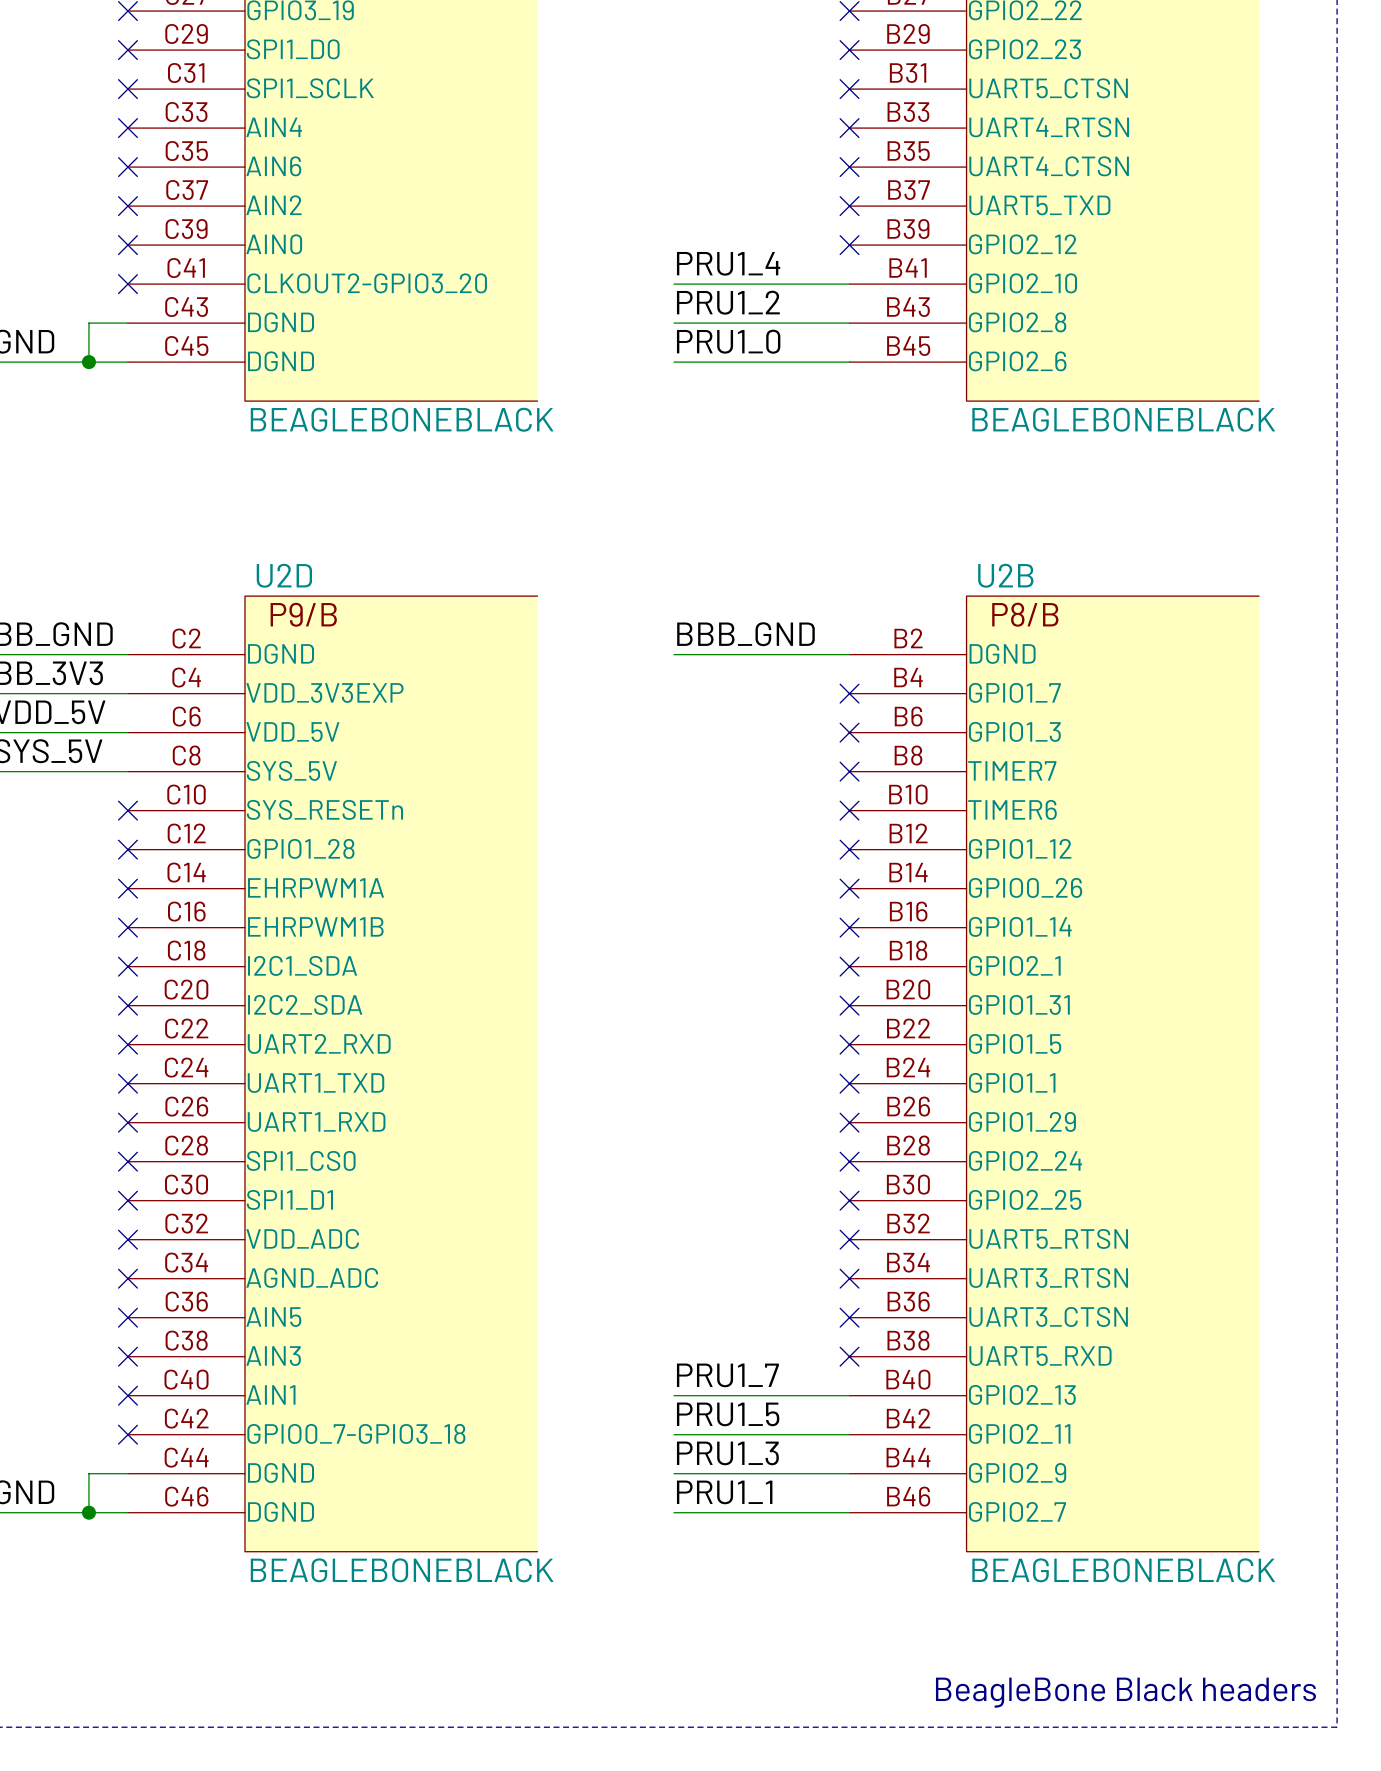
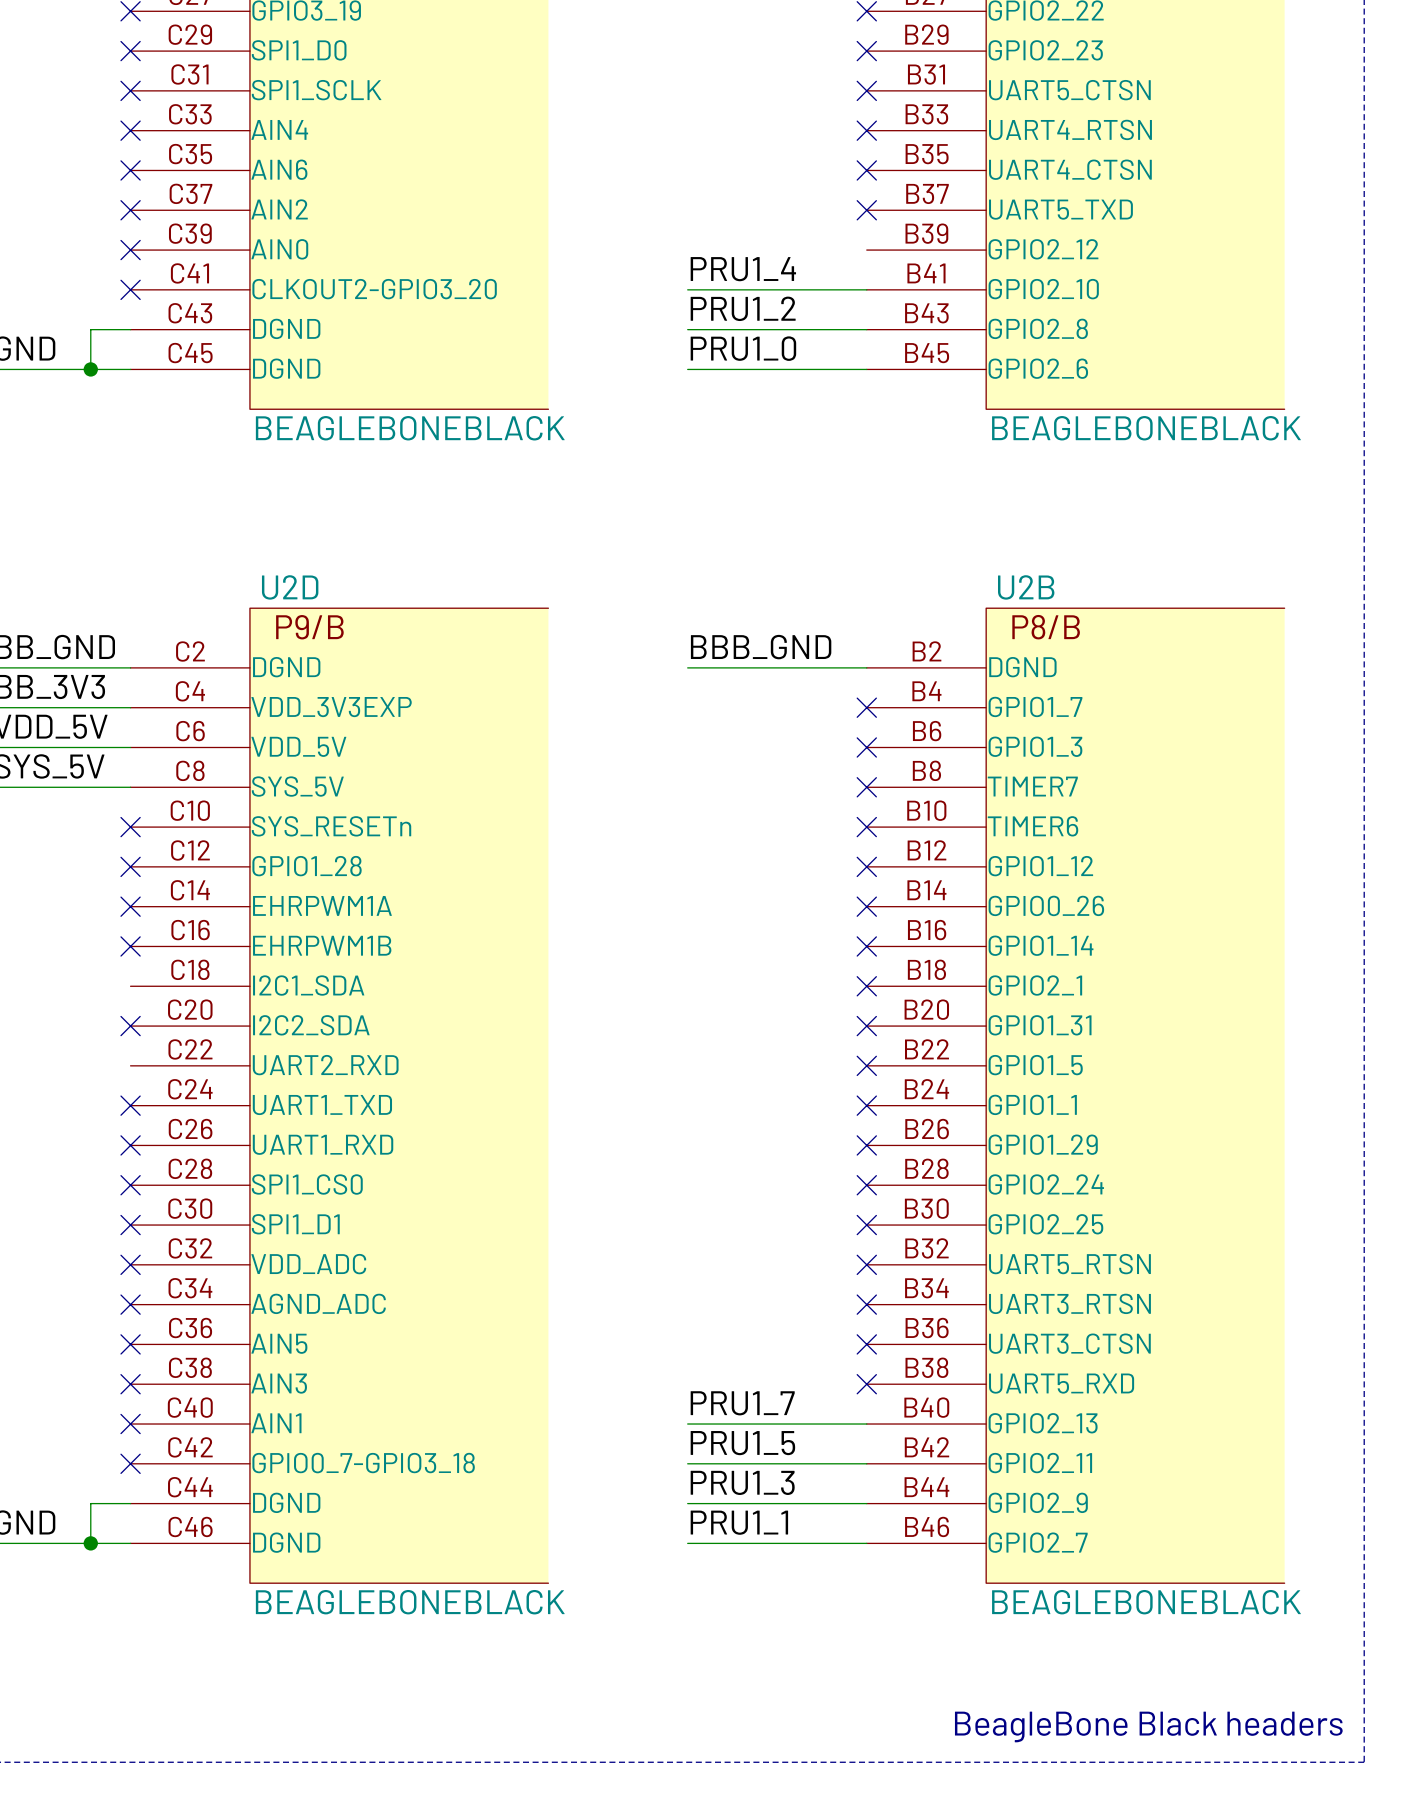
no-connect mark: (849, 245) -> none
no-connect mark: (127, 966) -> none
no-connect mark: (127, 1044) -> none

